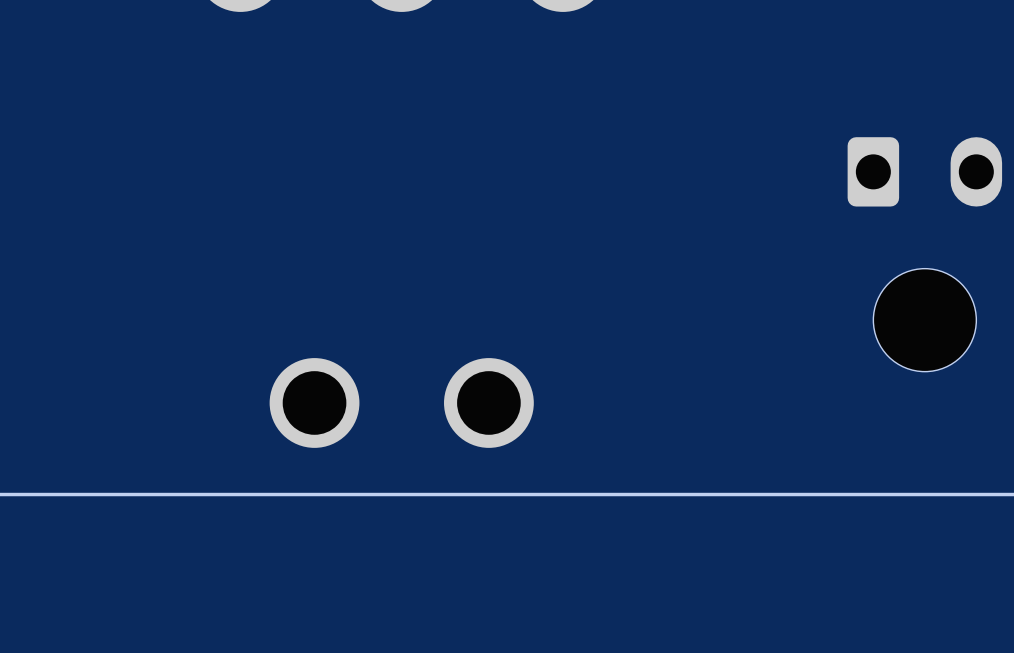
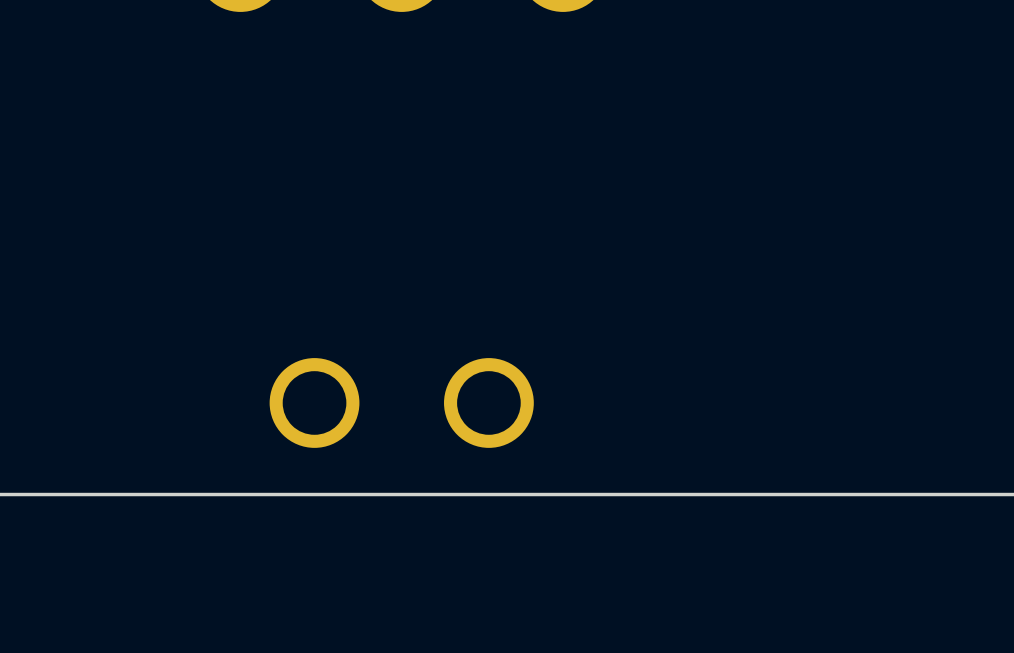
part: (924, 254) -> none

